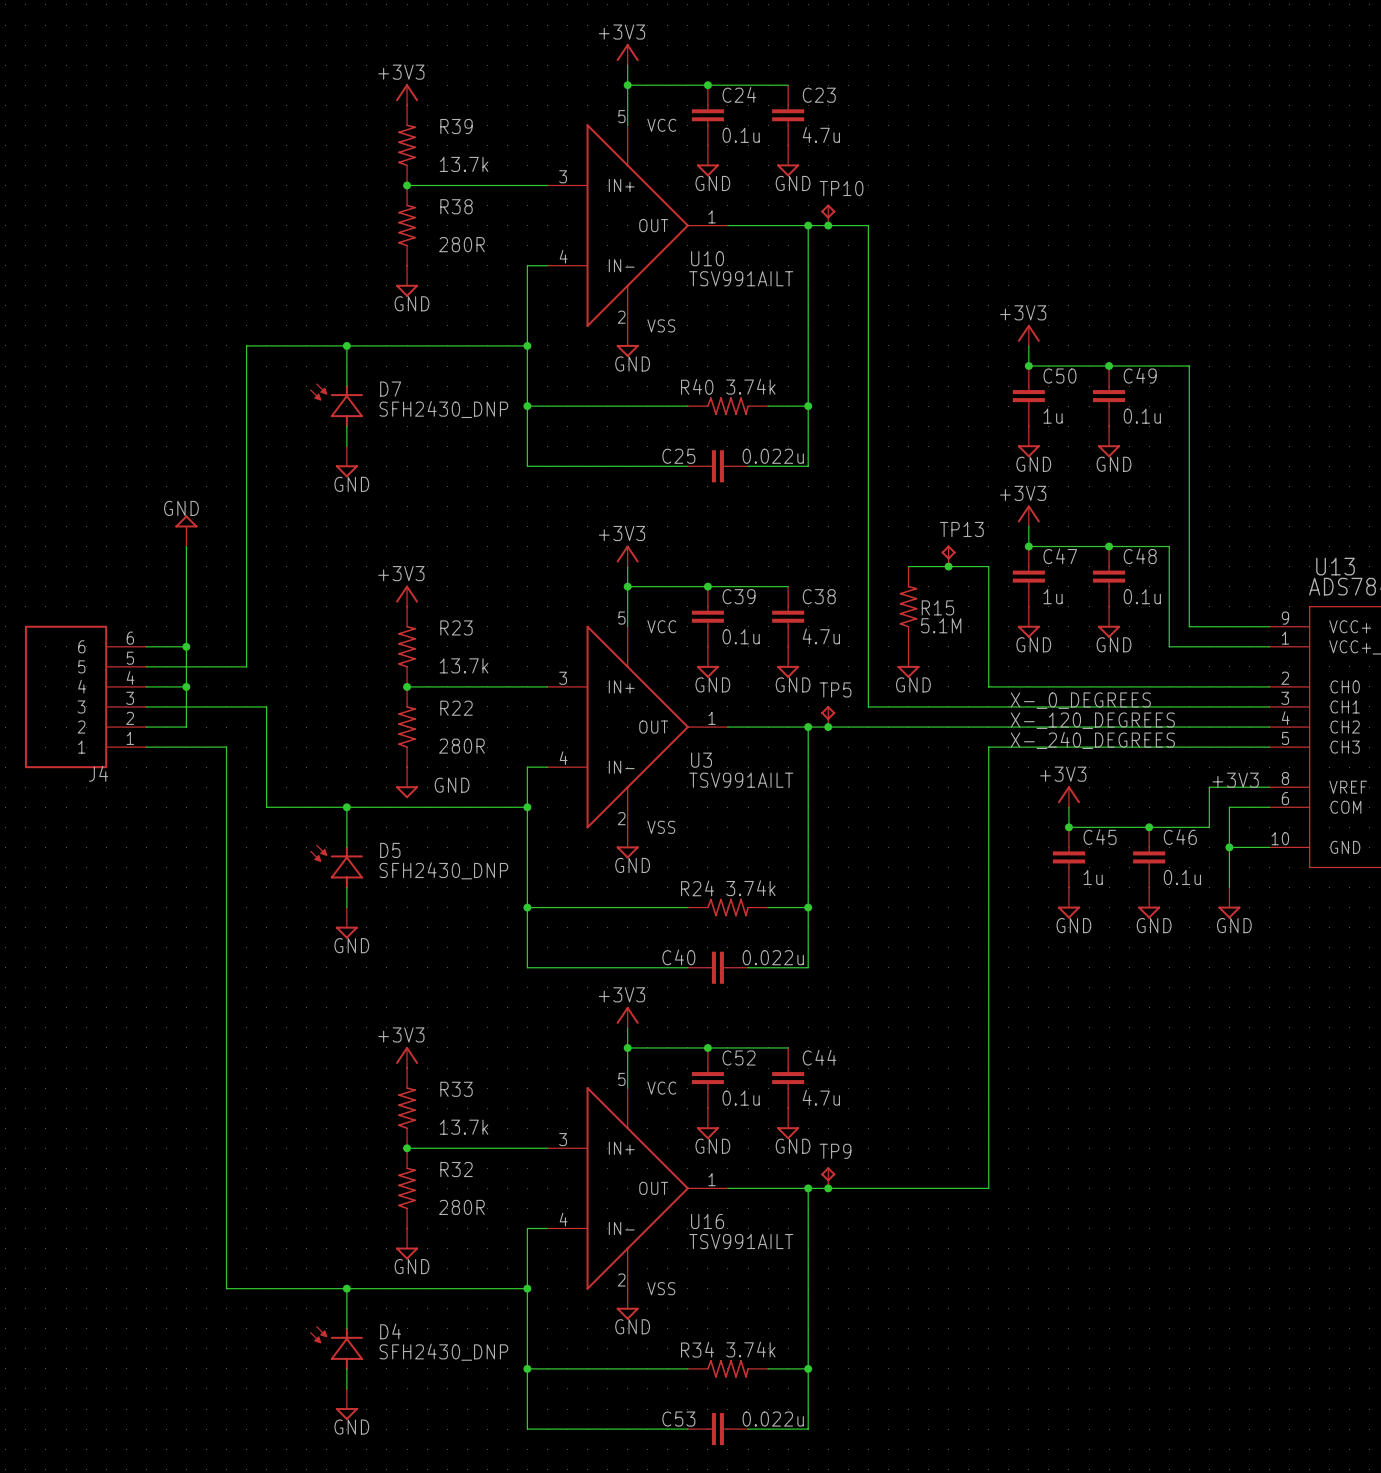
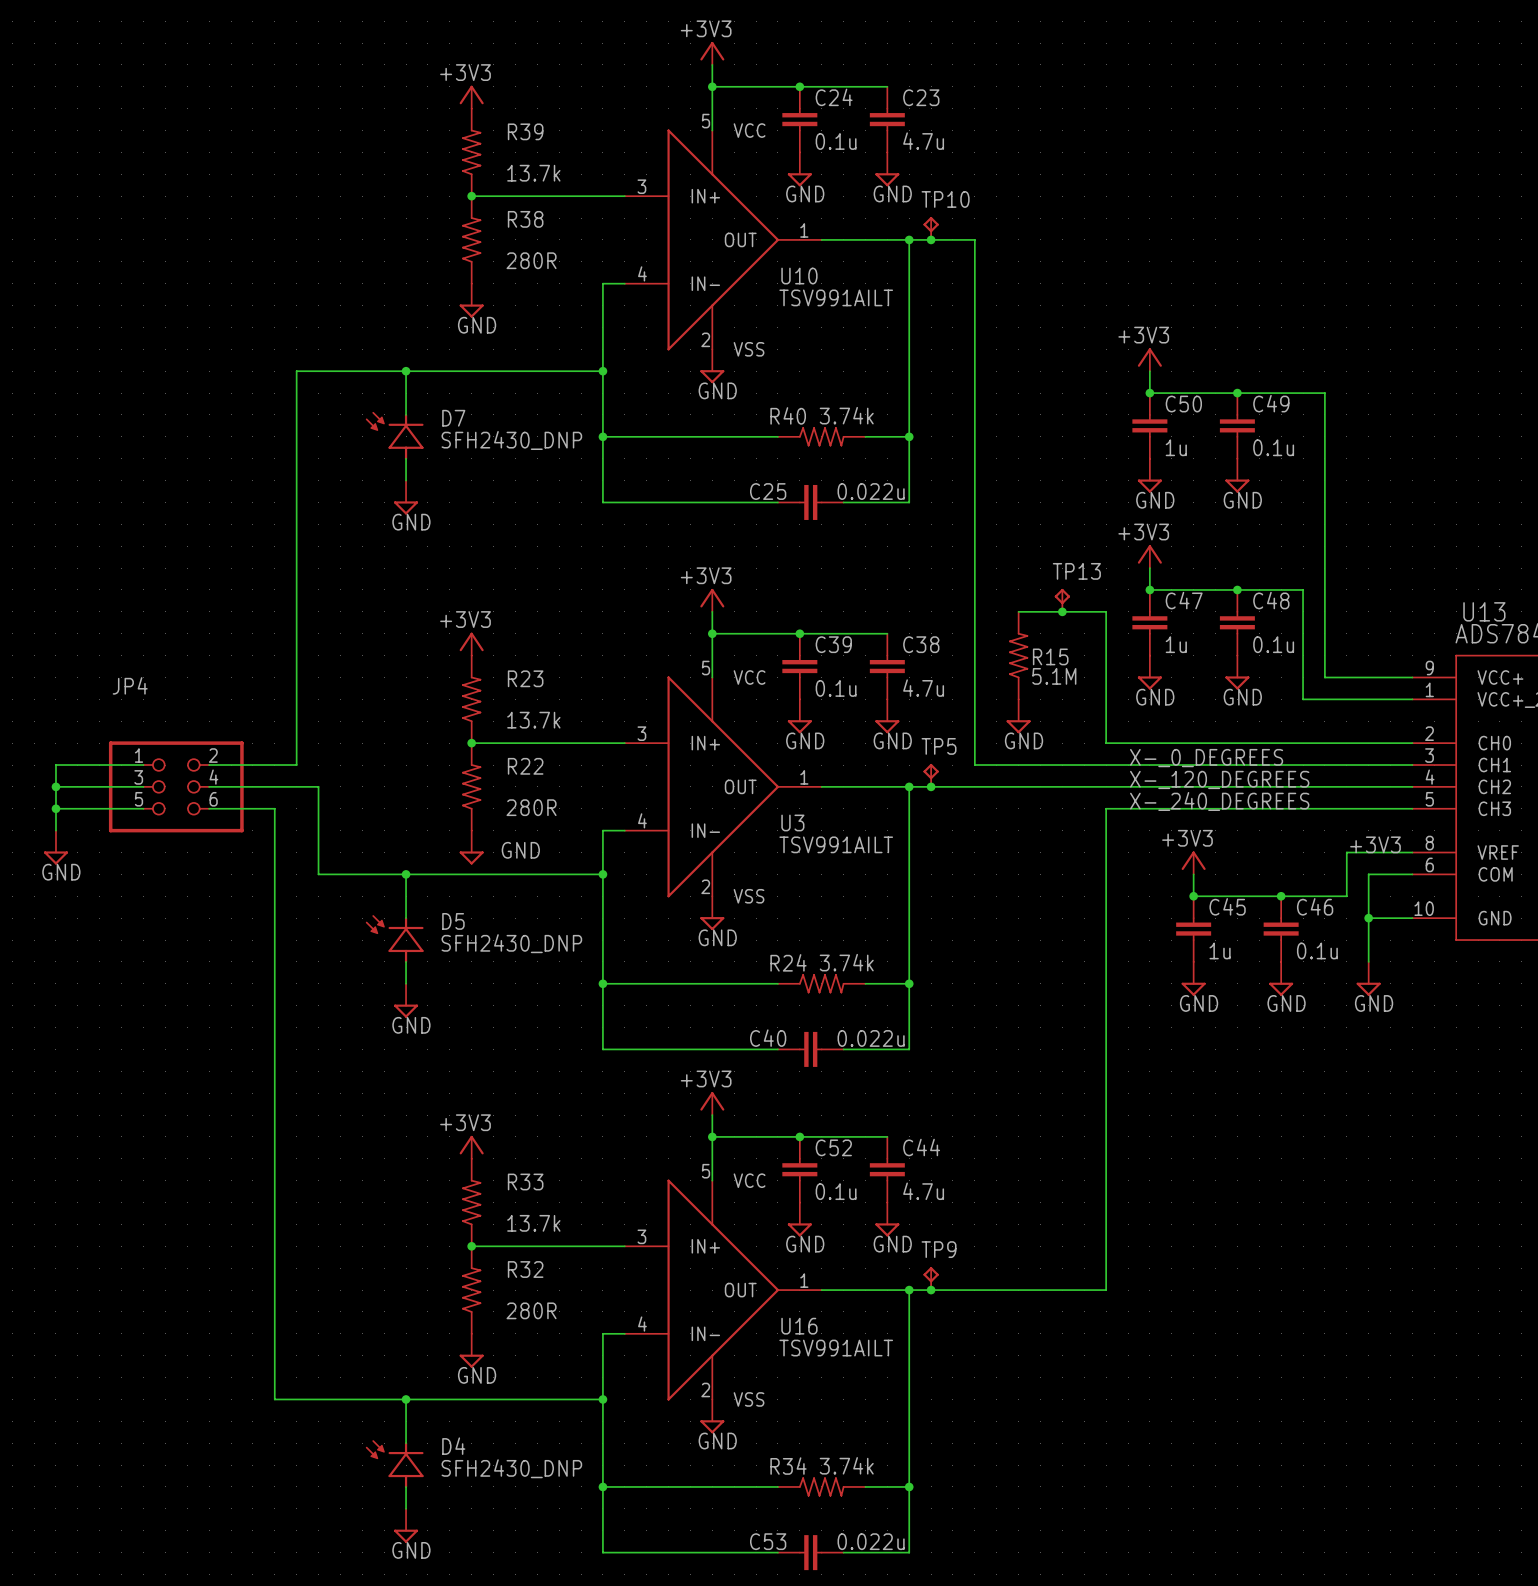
power symbol: GND (186, 530) -> none
wire: (186, 546) (186, 727) -> (318, 786) (231, 786)
wire: (146, 646) (186, 646) -> none
junction: (186, 646) -> none
wire: (146, 666) (246, 666) -> none
junction: (186, 686) -> none
J4: (85, 696) -> none
wire: none -> (143, 765) (55, 765) (55, 830)
wire: (146, 706) (166, 706) -> none
wire: (246, 706) (266, 706) (266, 727) -> (296, 765) (296, 721)
wire: none -> (55, 786) (143, 786)
junction: none -> (55, 786)
JP4: none -> (176, 786)
wire: (146, 727) (166, 727) -> none
wire: none -> (55, 808) (143, 808)
junction: none -> (55, 808)
wire: (146, 747) (166, 747) -> none
power symbol: none -> GND (55, 847)

